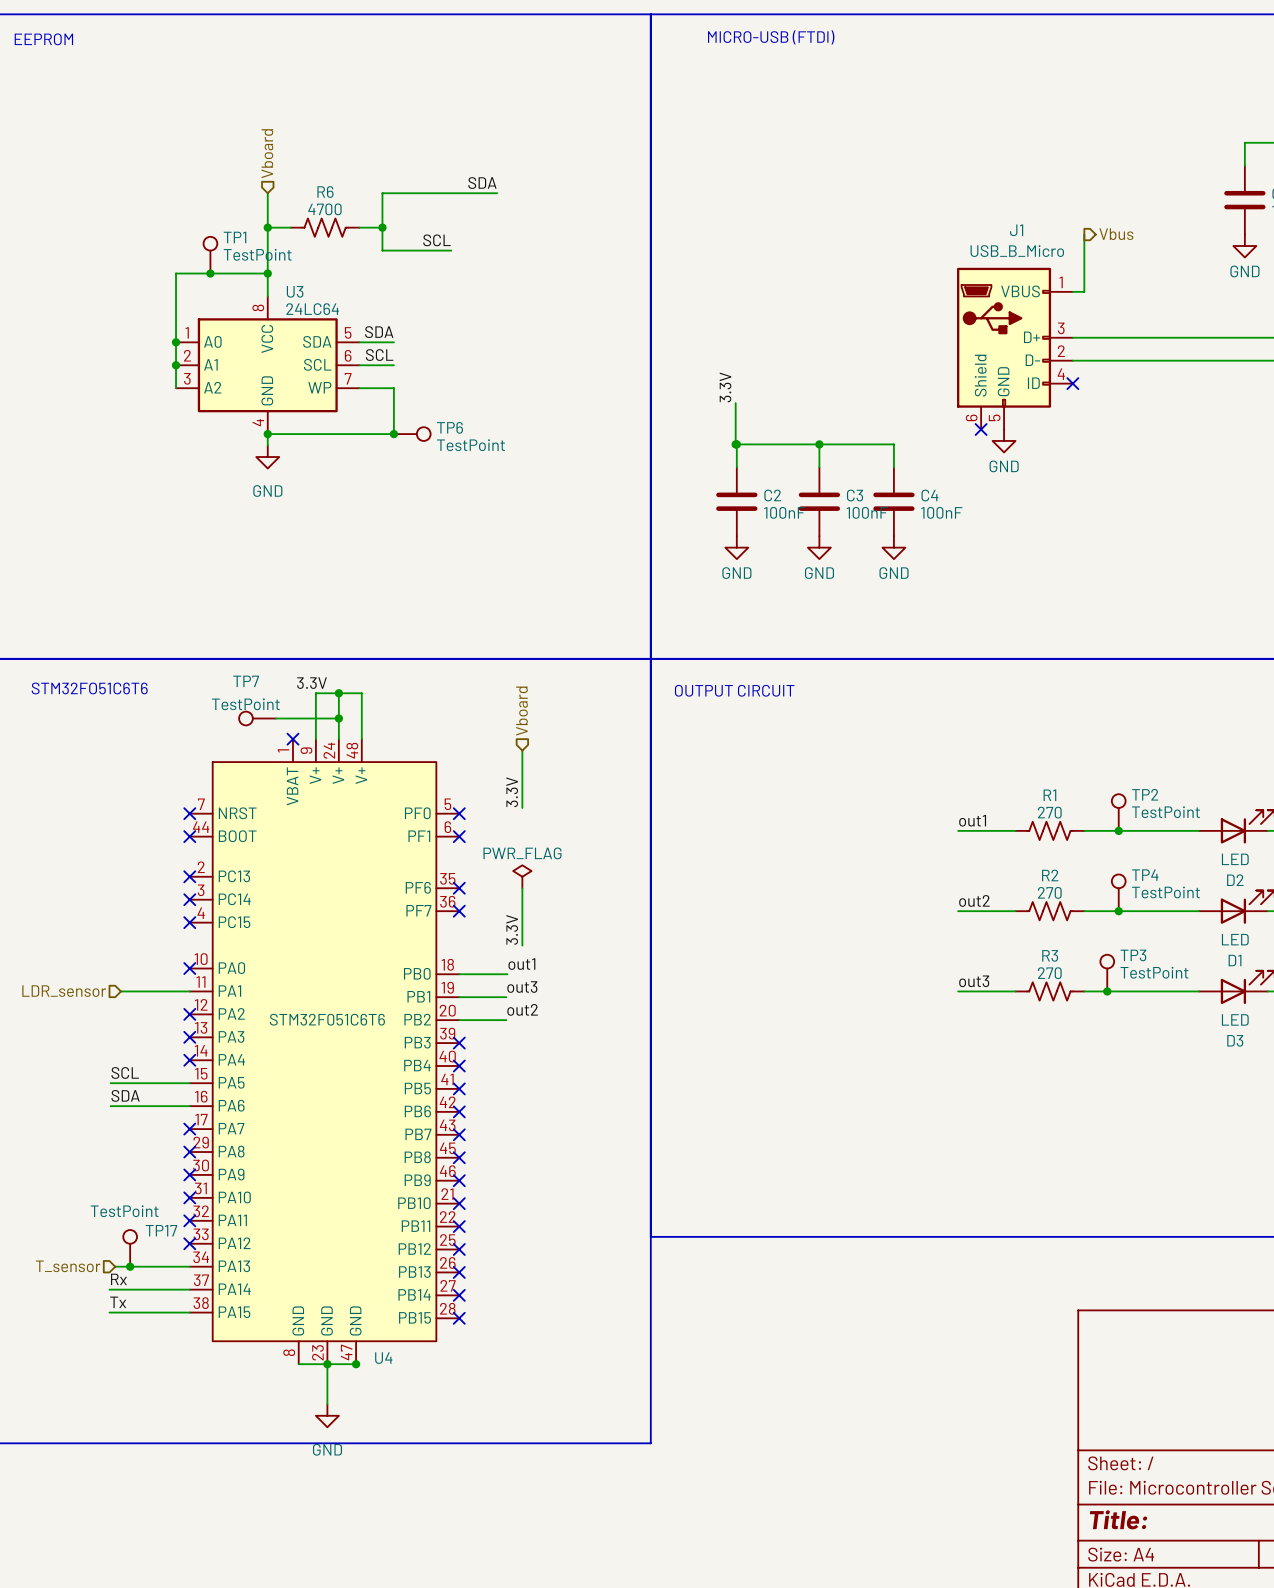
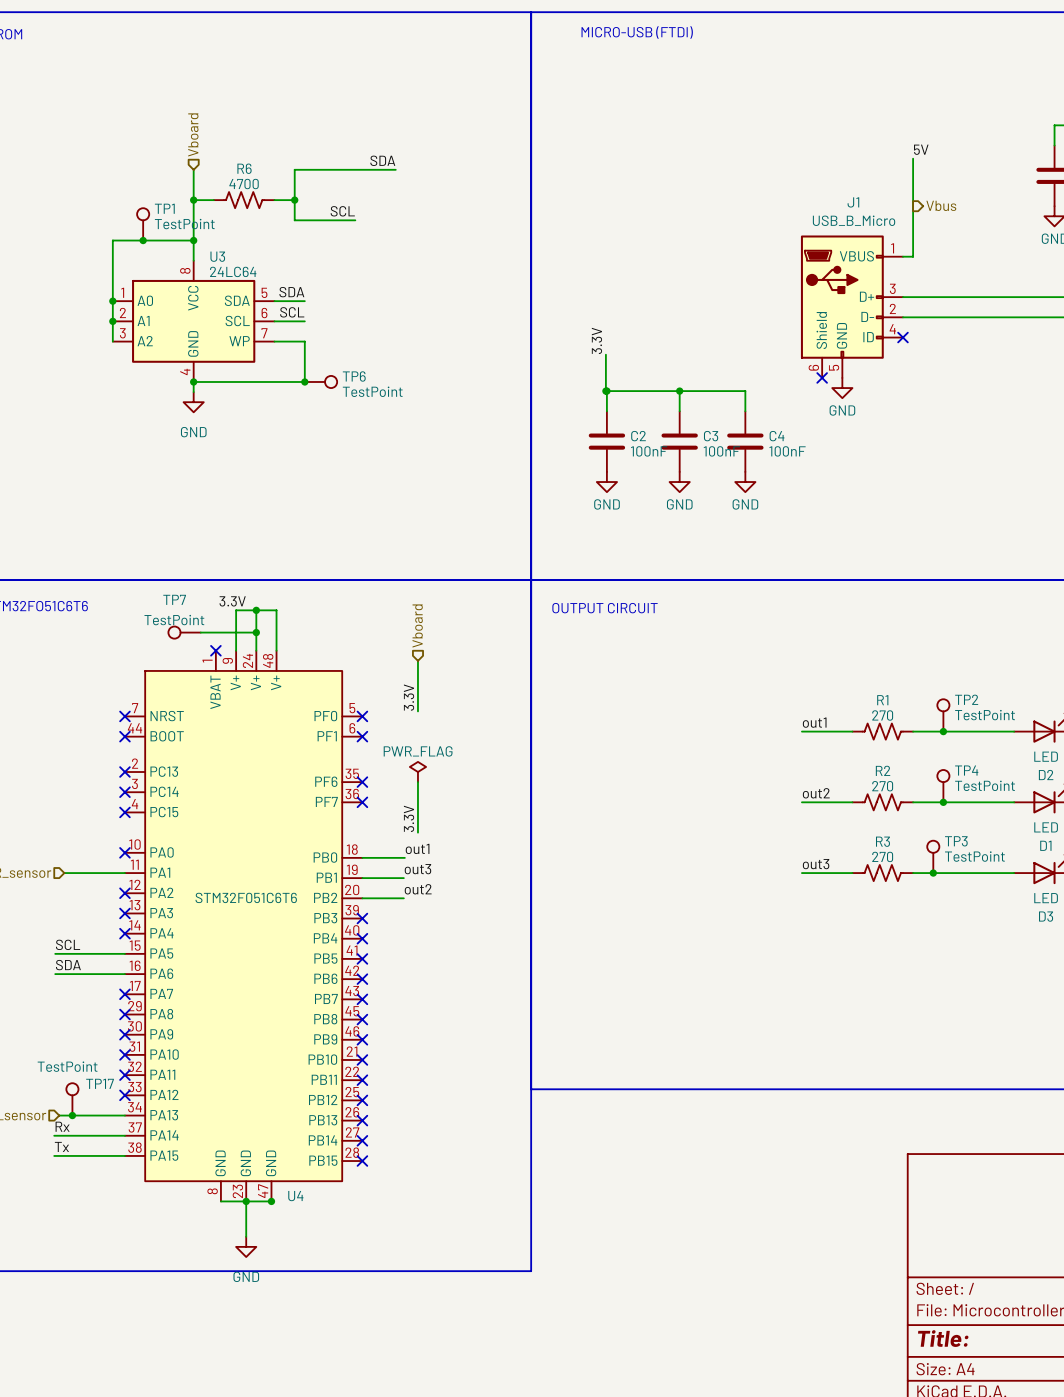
label: none -> 5V (921, 149)
wire: none -> (913, 158) (913, 206)

